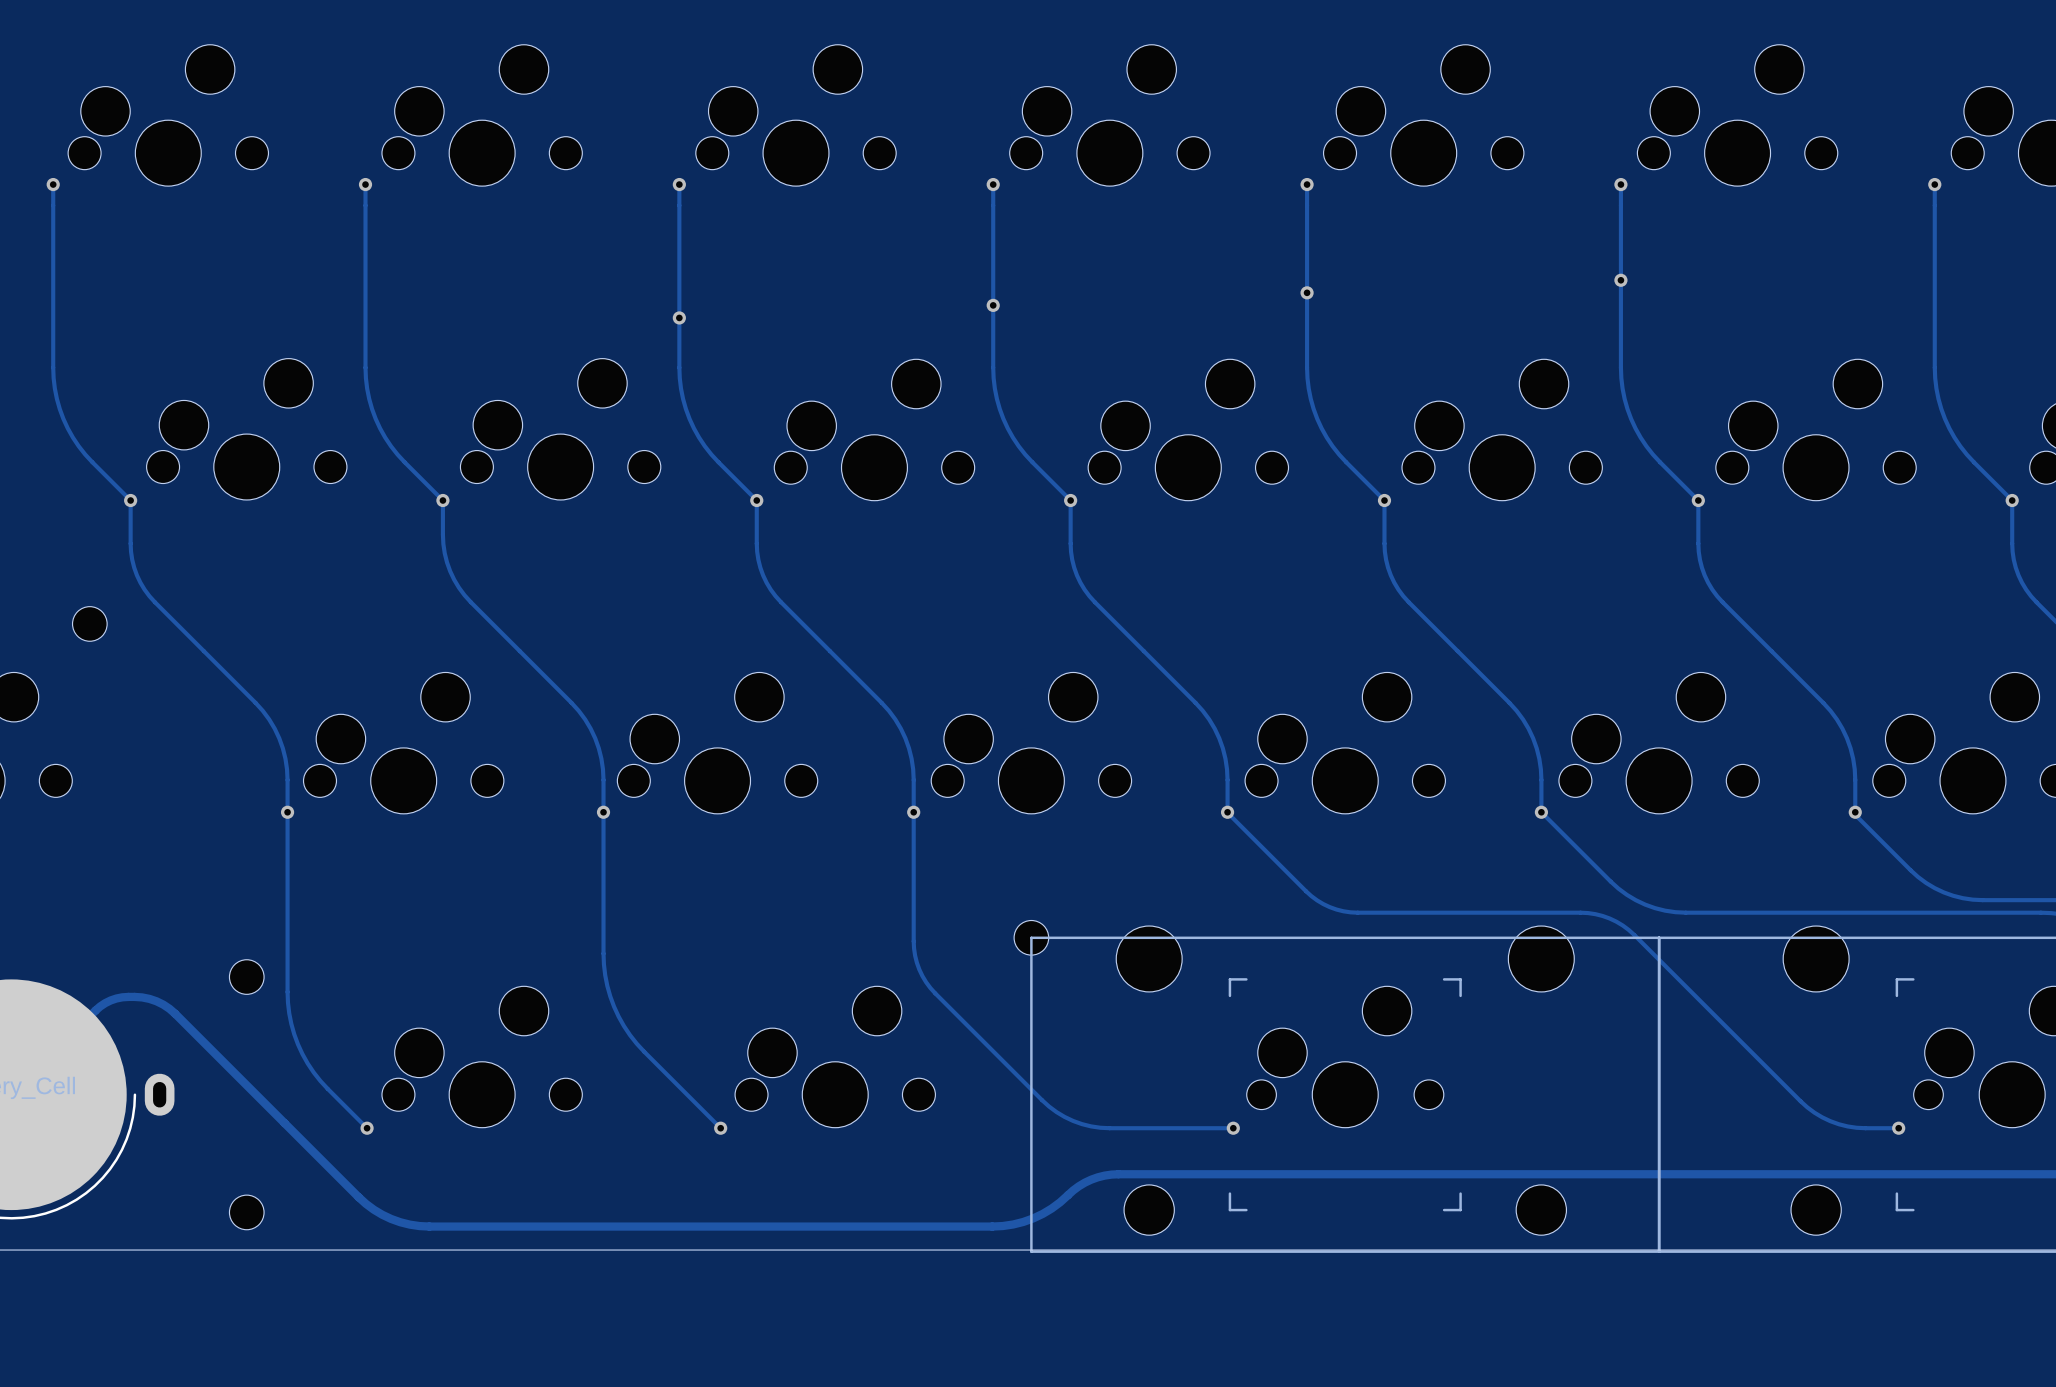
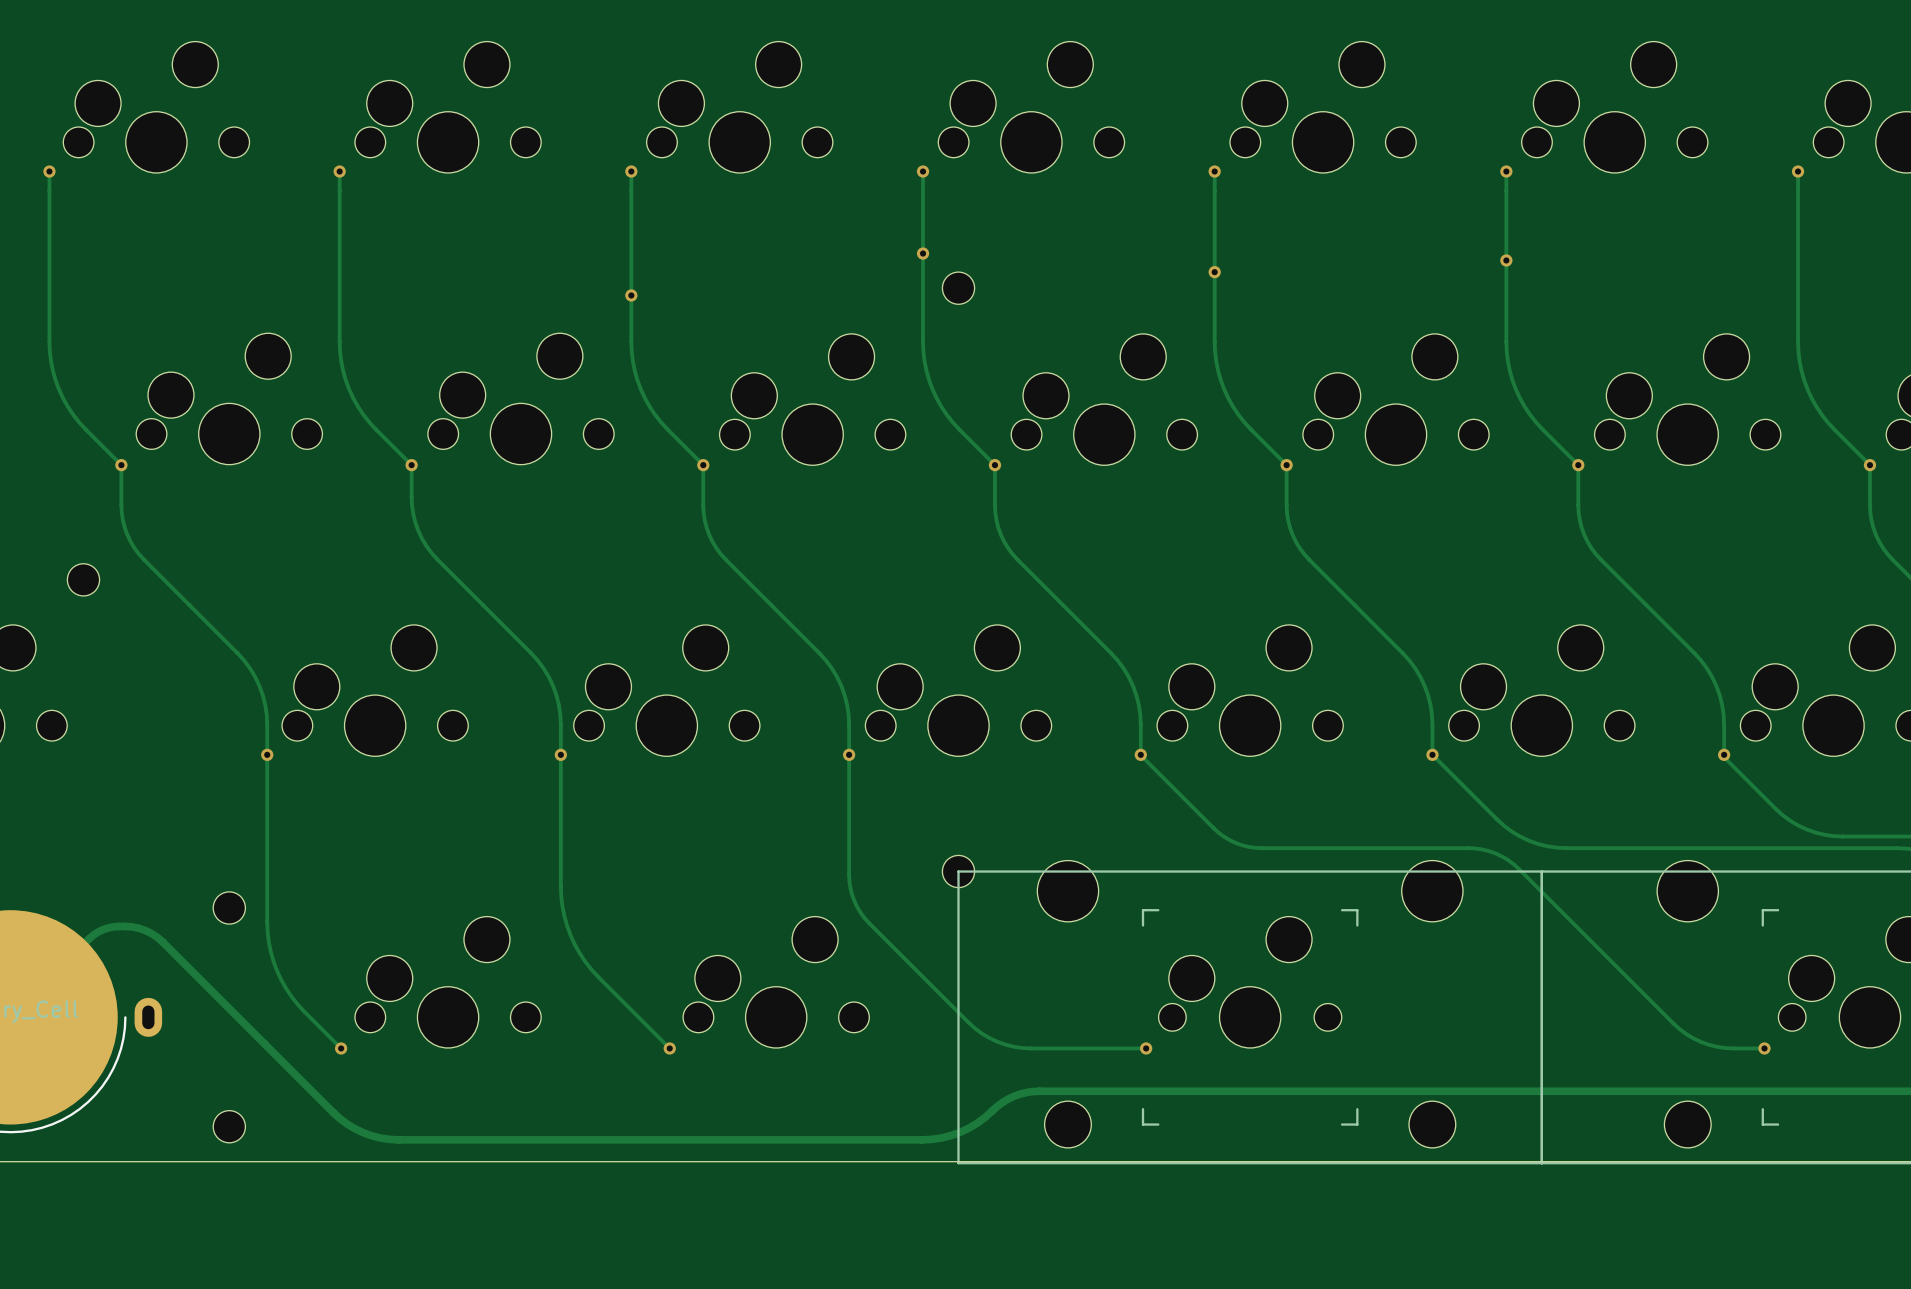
via position: (993, 305) -> (923, 253)
part: none -> (958, 288)

